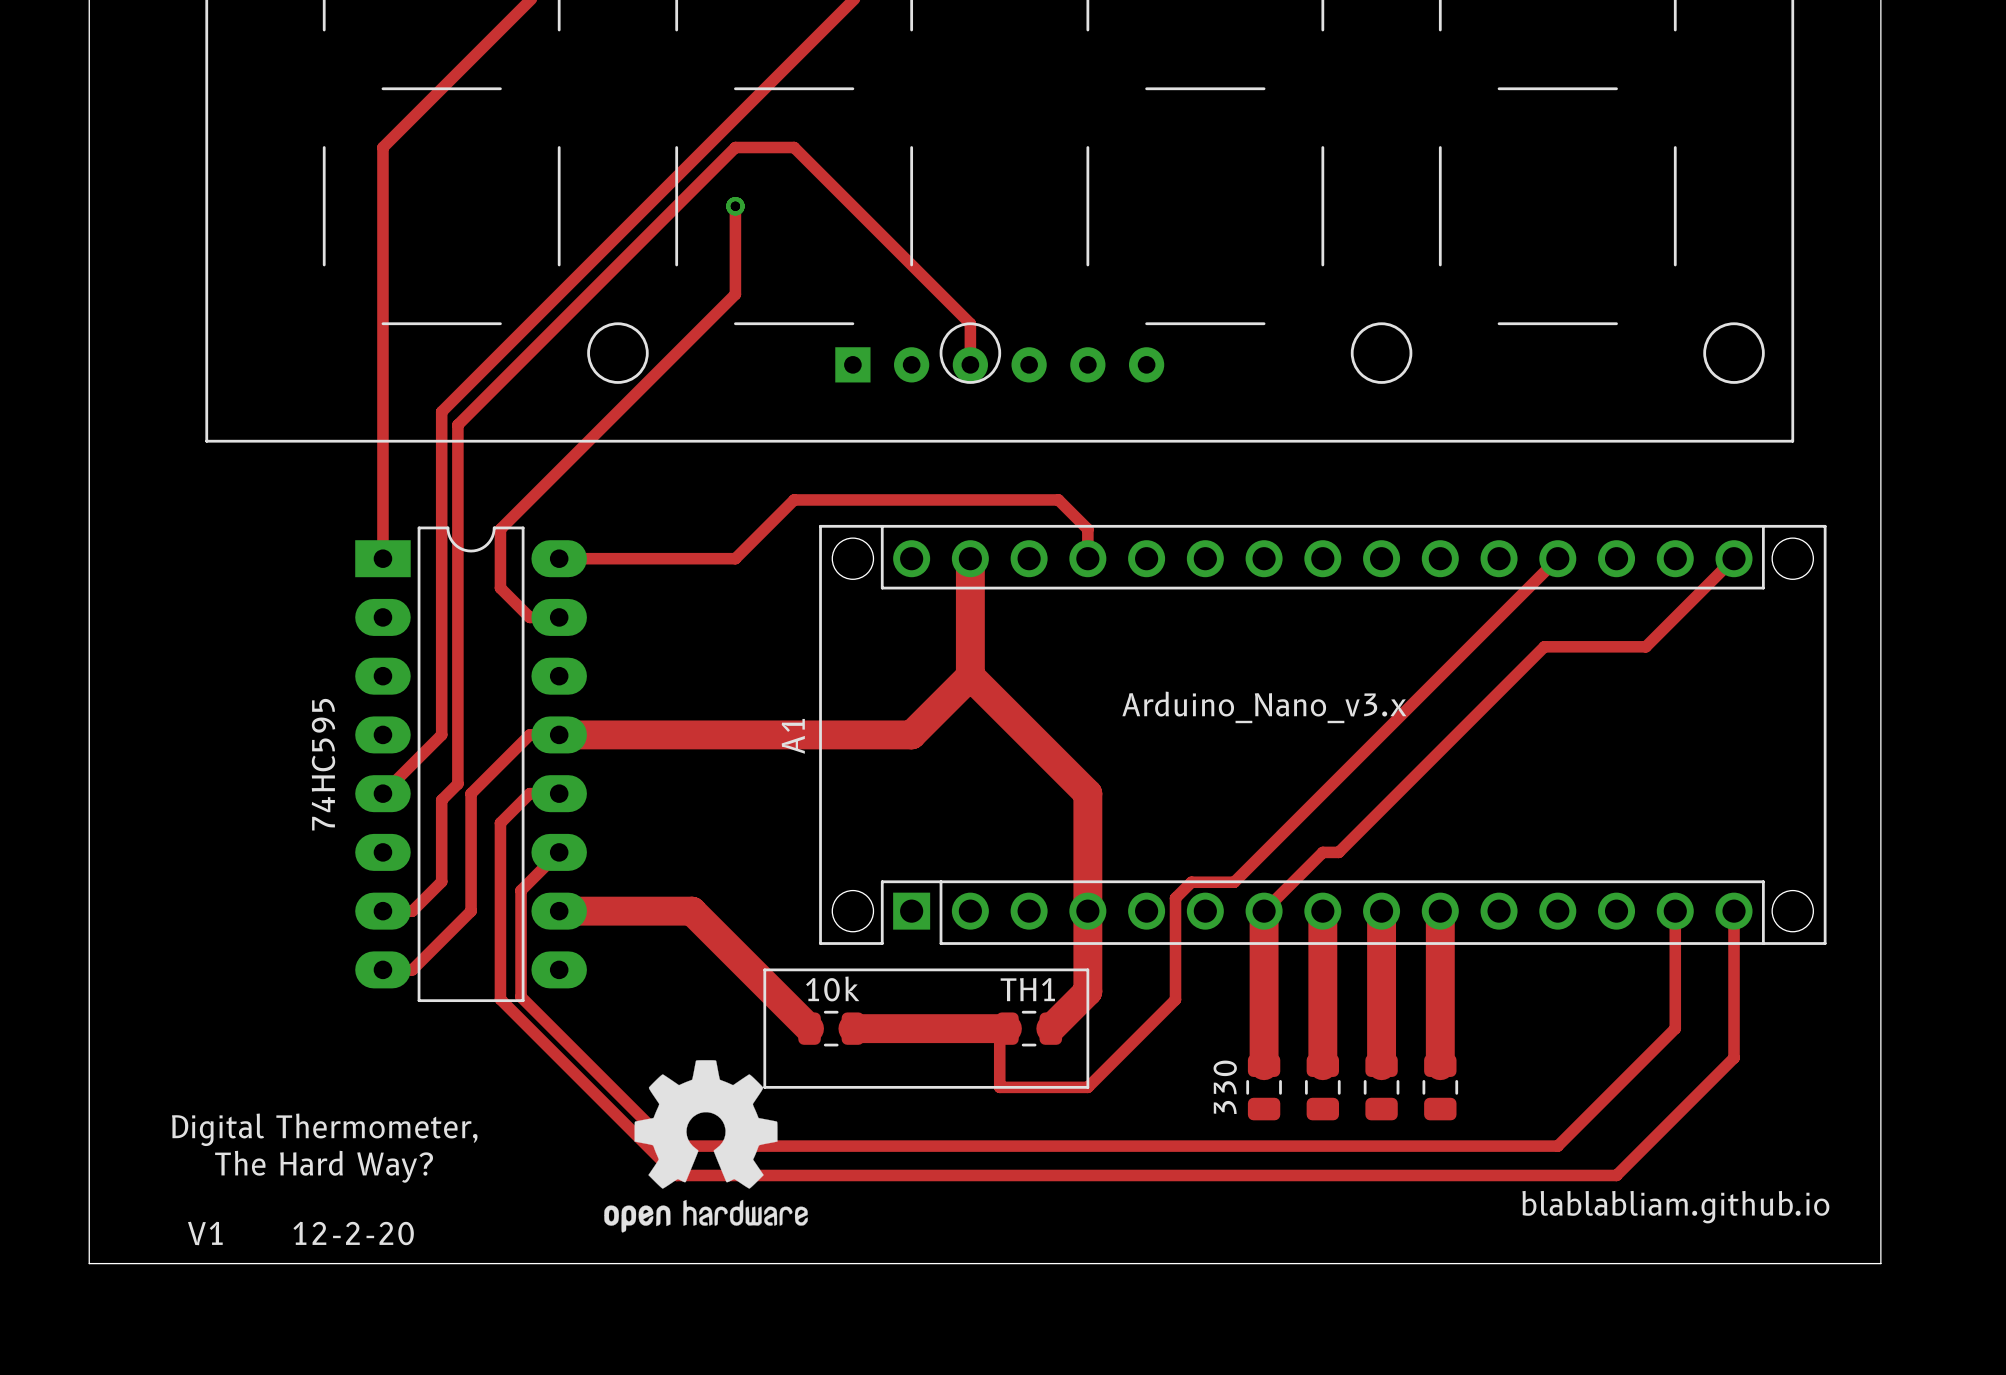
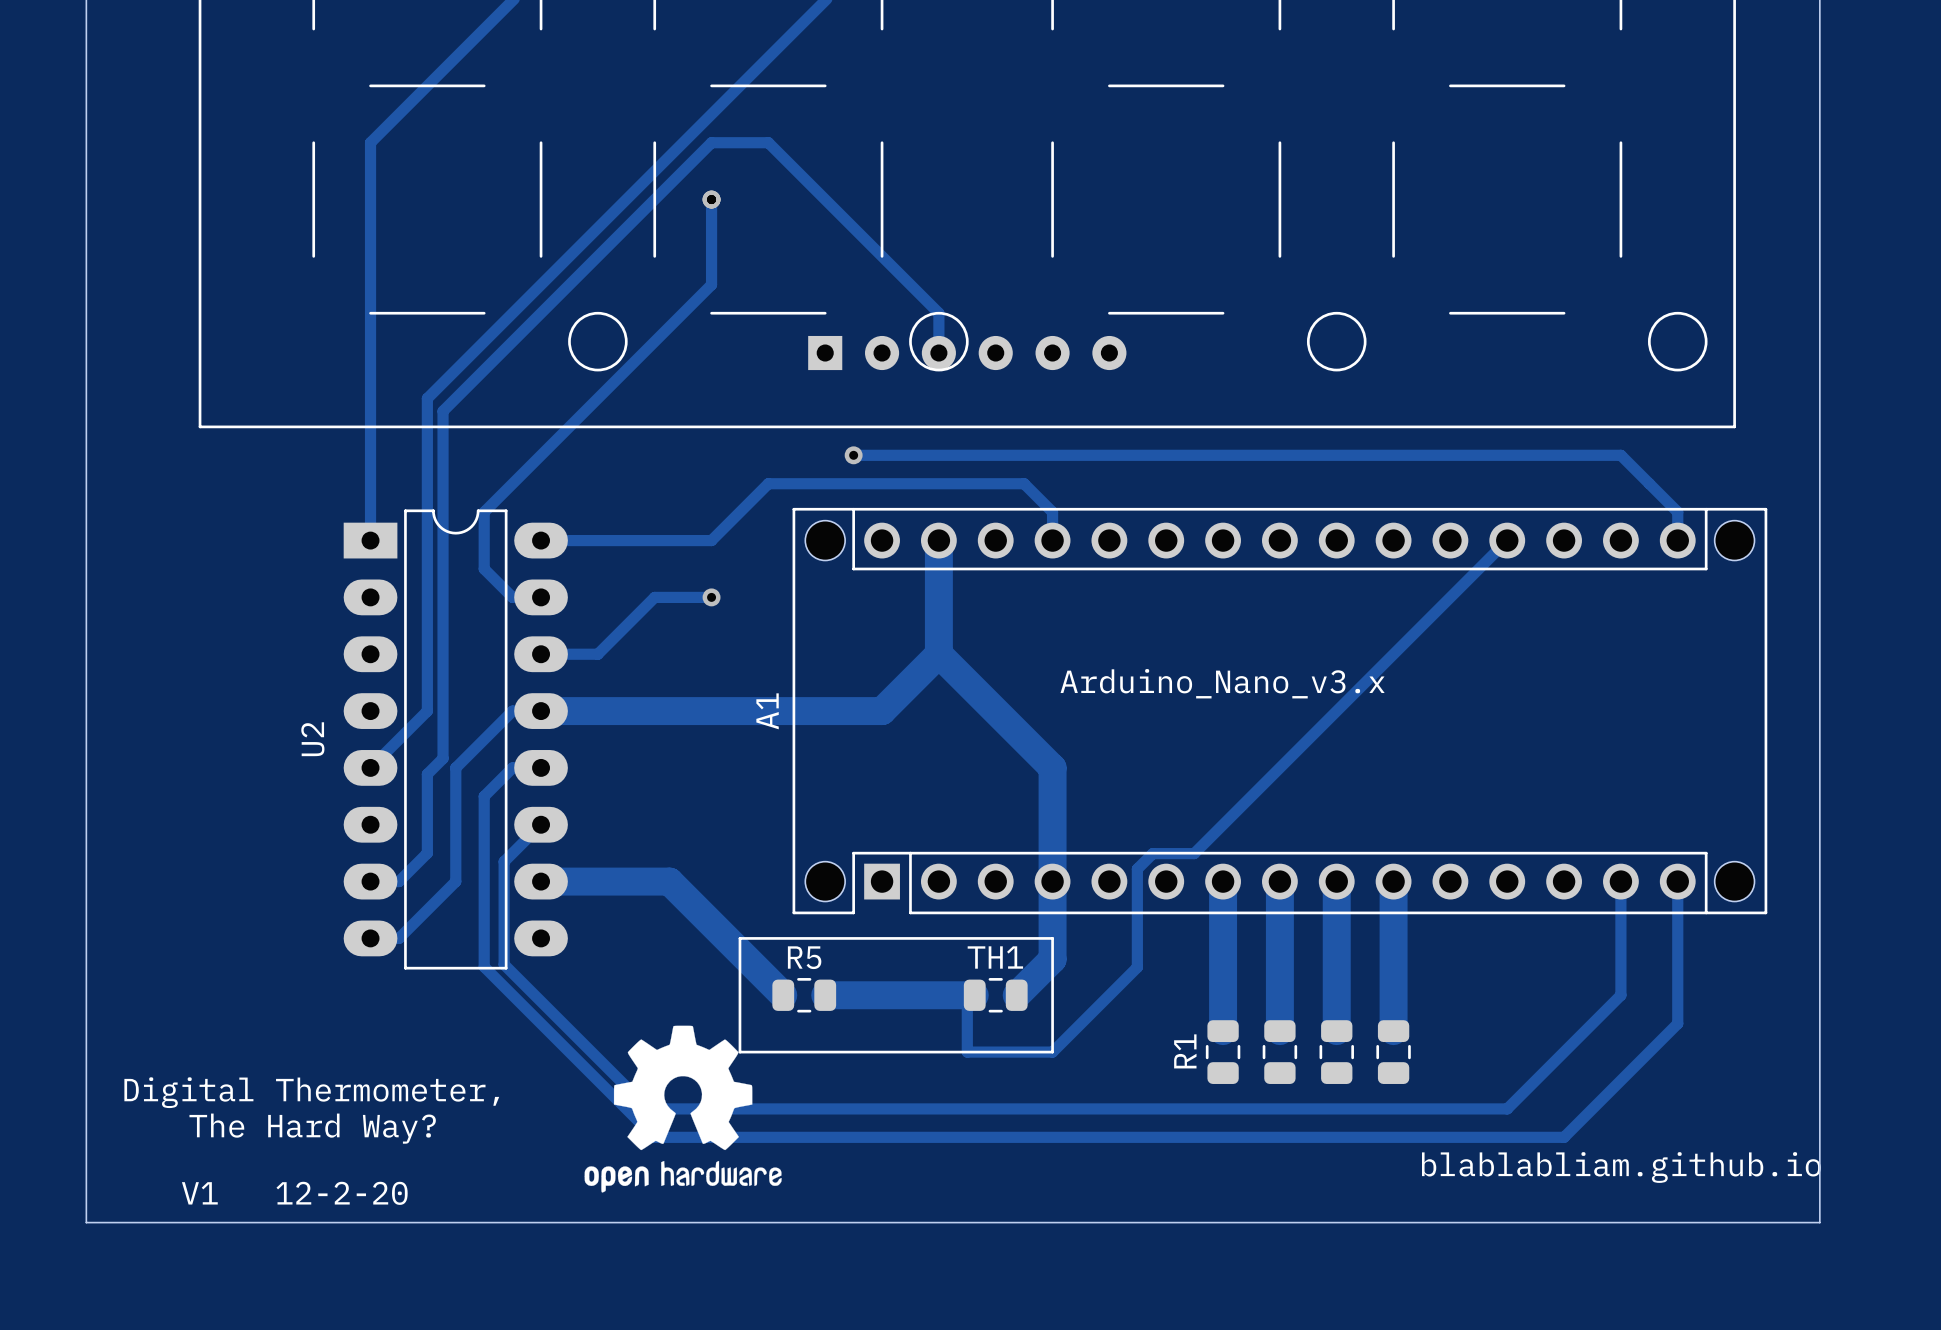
via: none -> (853, 455)
track: (1734, 558) (1645, 646) (1544, 646) (1338, 852) (1322, 852) (1264, 911) -> (1677, 540) (1677, 512) (1620, 455) (853, 455)
track: none -> (711, 597) (654, 597) (597, 654) (541, 654)
via: none -> (711, 597)
74HC595 name: 74HC595 (323, 764) -> U2 (312, 739)
10k name: 10k (832, 988) -> R5 (804, 957)
330 name: 330 (1225, 1087) -> R1 (1185, 1051)

